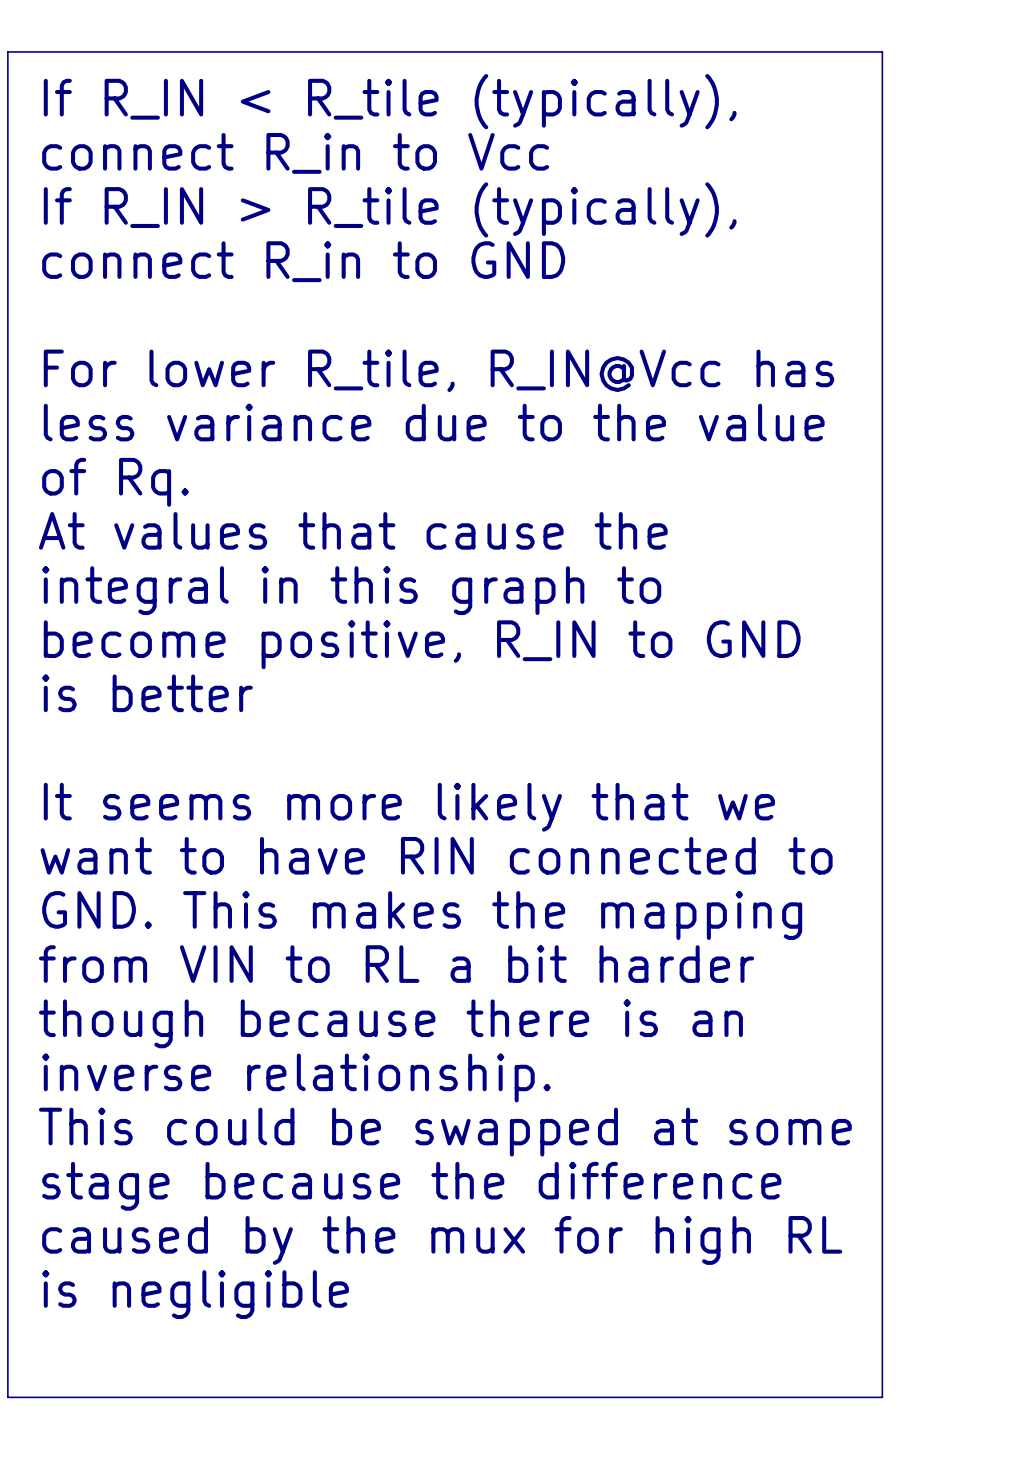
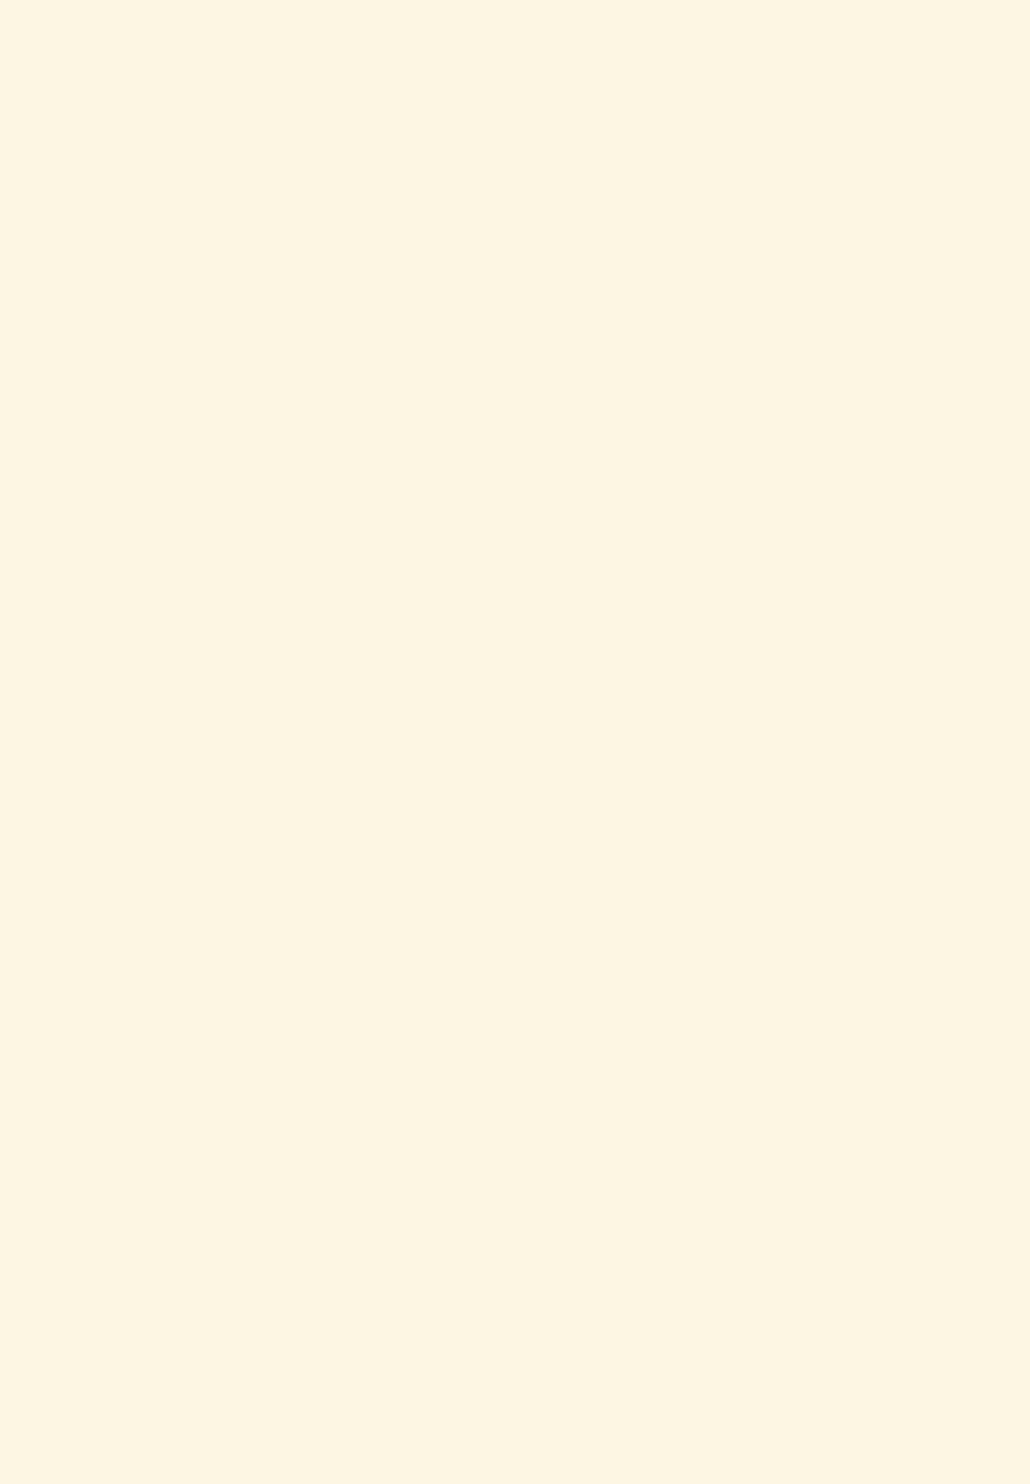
line: (7, 51) (882, 51) (882, 1397) (7, 1397) (7, 51) -> none
text: If R_IN < R_tile (typically), (390, 101) -> none
text: connect R_in to Vcc (295, 153) -> none
text: If R_IN > R_tile (typically), (390, 209) -> none
text: connect R_in to GND (303, 261) -> none
text: For lower R_tile, R_IN@Vcc has (438, 370) -> none
text: less variance due to the value (434, 422) -> none
text: of Rq. (115, 482) -> none
text: At values that cause the (353, 530) -> none
text: integral in this graph to (351, 590) -> none
text: become positive, R_IN to GND (422, 644) -> none
text: is better (147, 693) -> none
text: It seems more likely that we (409, 807) -> none
text: want to have RIN connected to (436, 855) -> none
text: GND. This makes the mapping (422, 915) -> none
text: from VIN to RL a bit harder (396, 964) -> none
text: though because there is an (390, 1023) -> none
text: inverse relationship. (296, 1077) -> none
text: This could be swapped at some (445, 1132) -> none
text: stage because the difference (411, 1186) -> none
text: caused by the mux for high RL (442, 1240) -> none
text: is negligible (195, 1294) -> none

